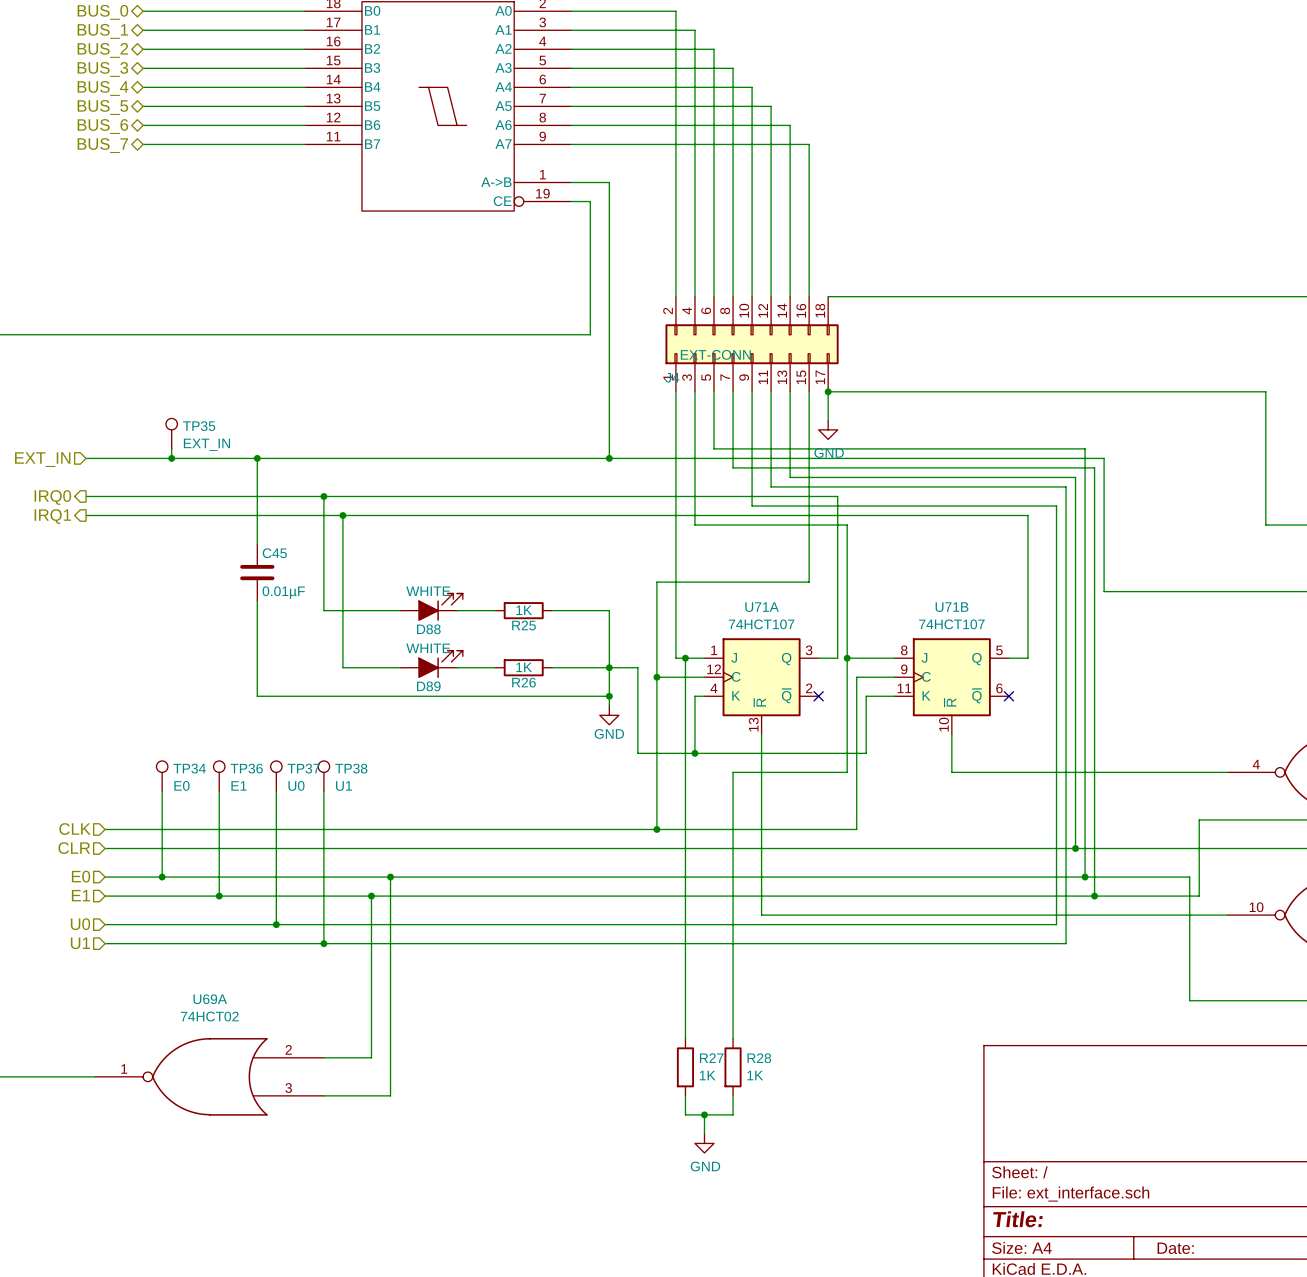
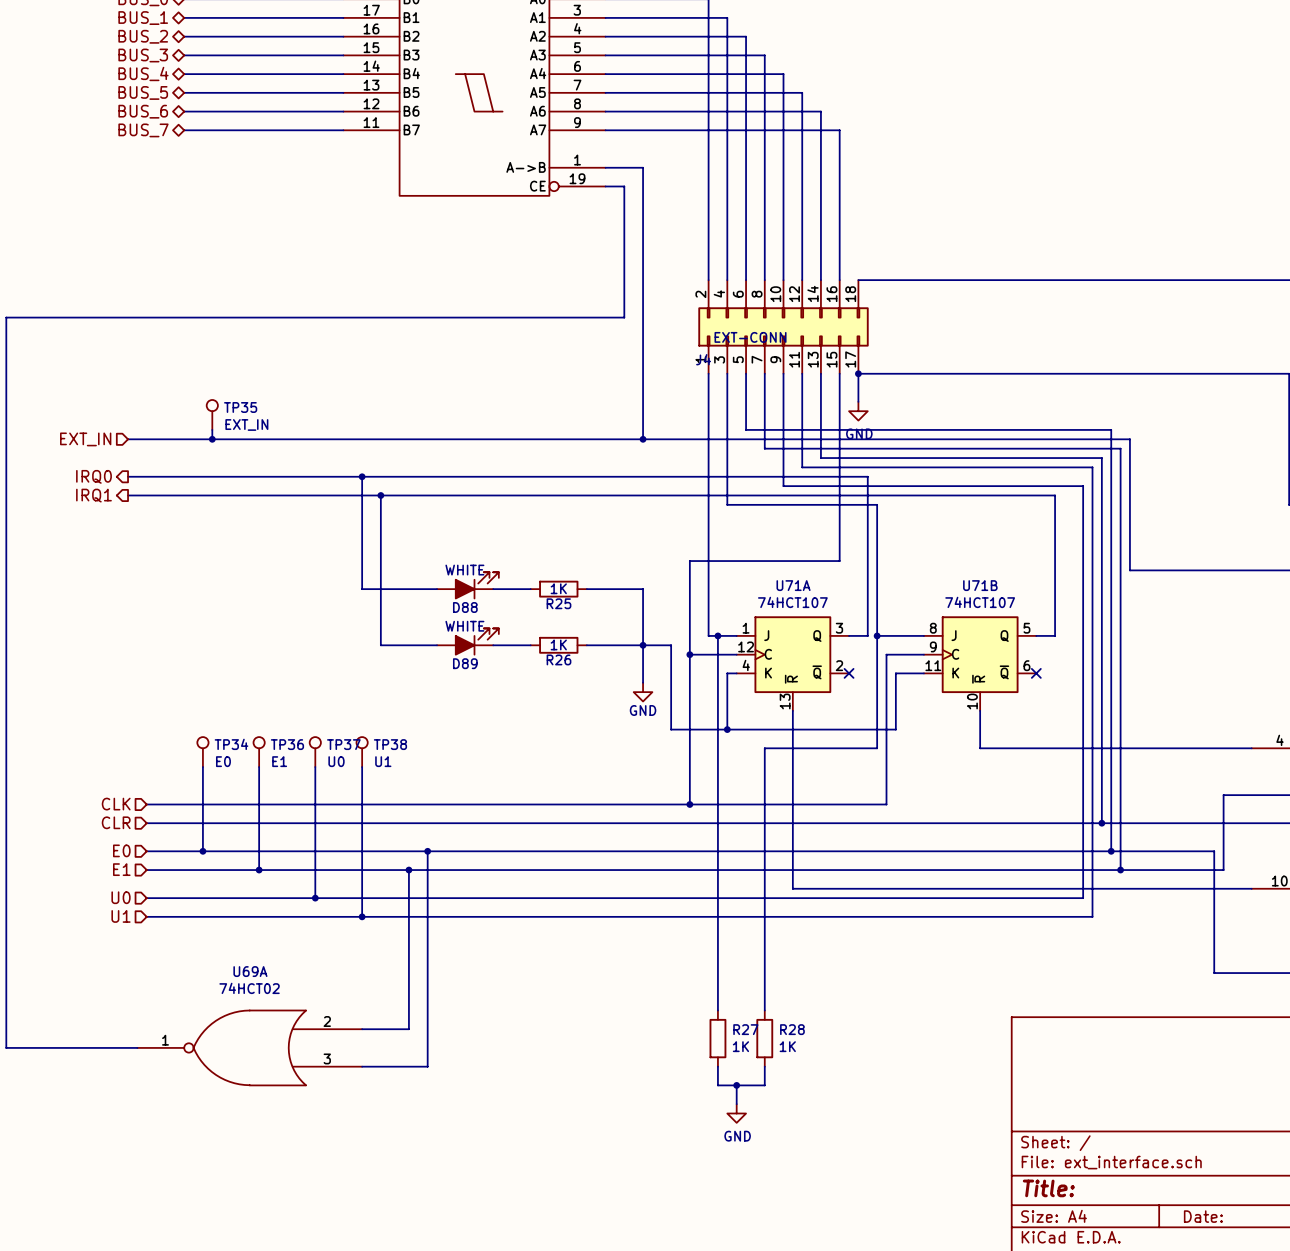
wire: (257, 458) (257, 544) -> none
junction: (257, 458) -> none
C45: 0.01µF (257, 572) -> none
wire: (257, 601) (257, 696) (609, 696) -> none
junction: (609, 696) -> none

